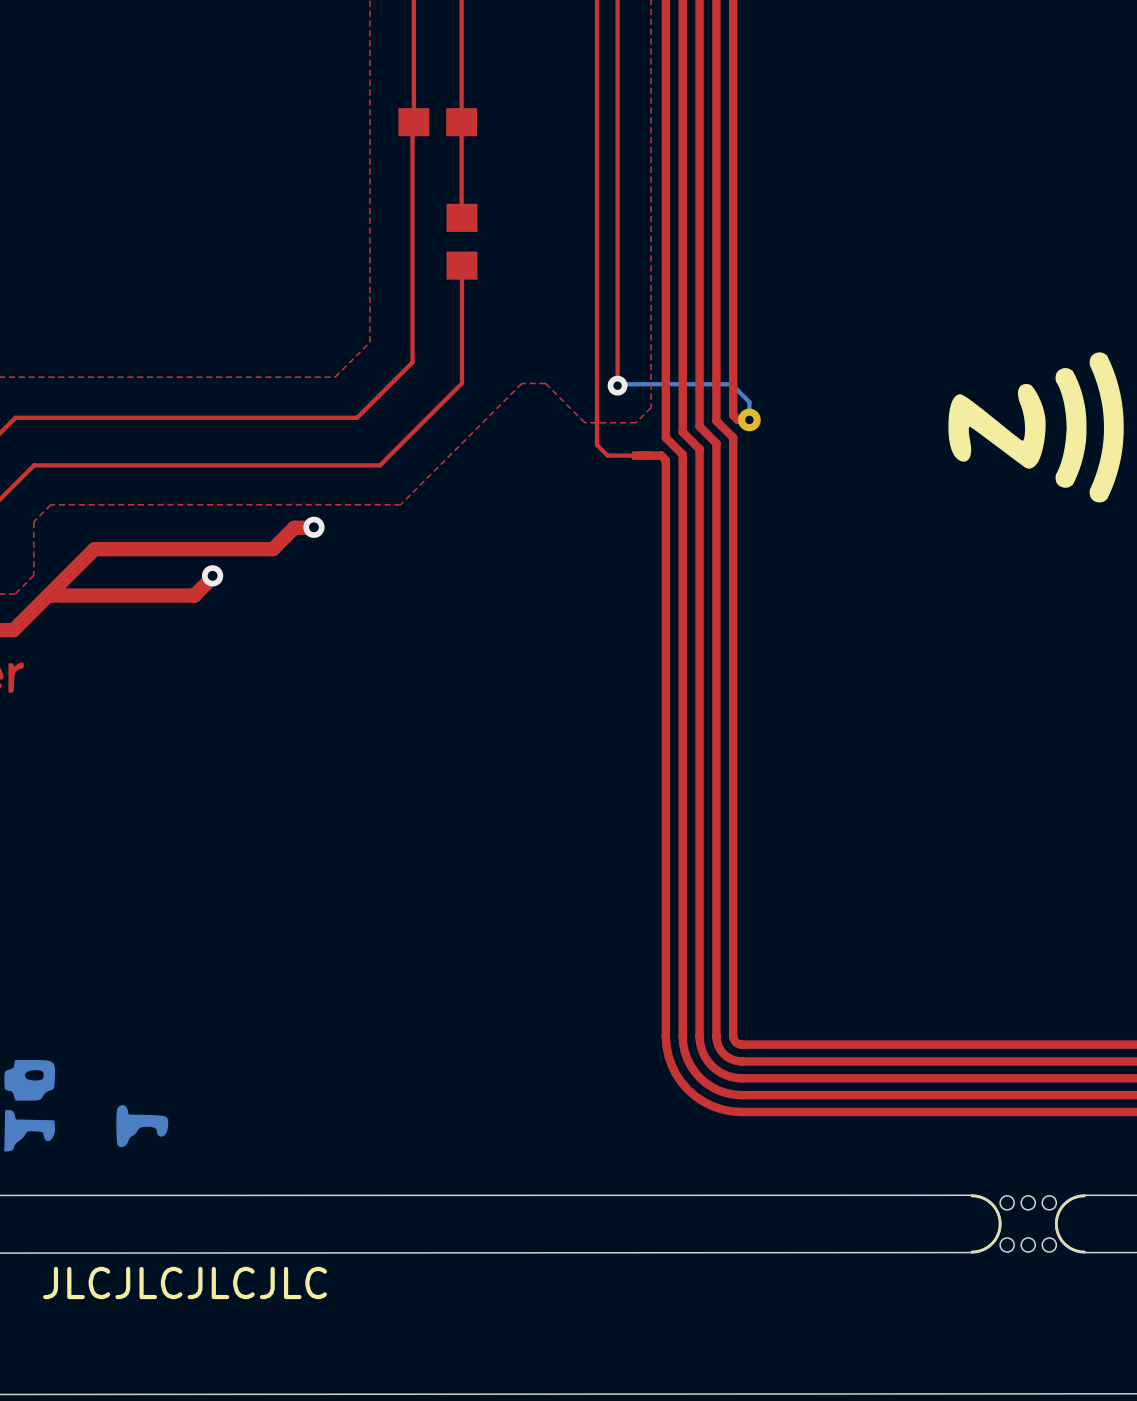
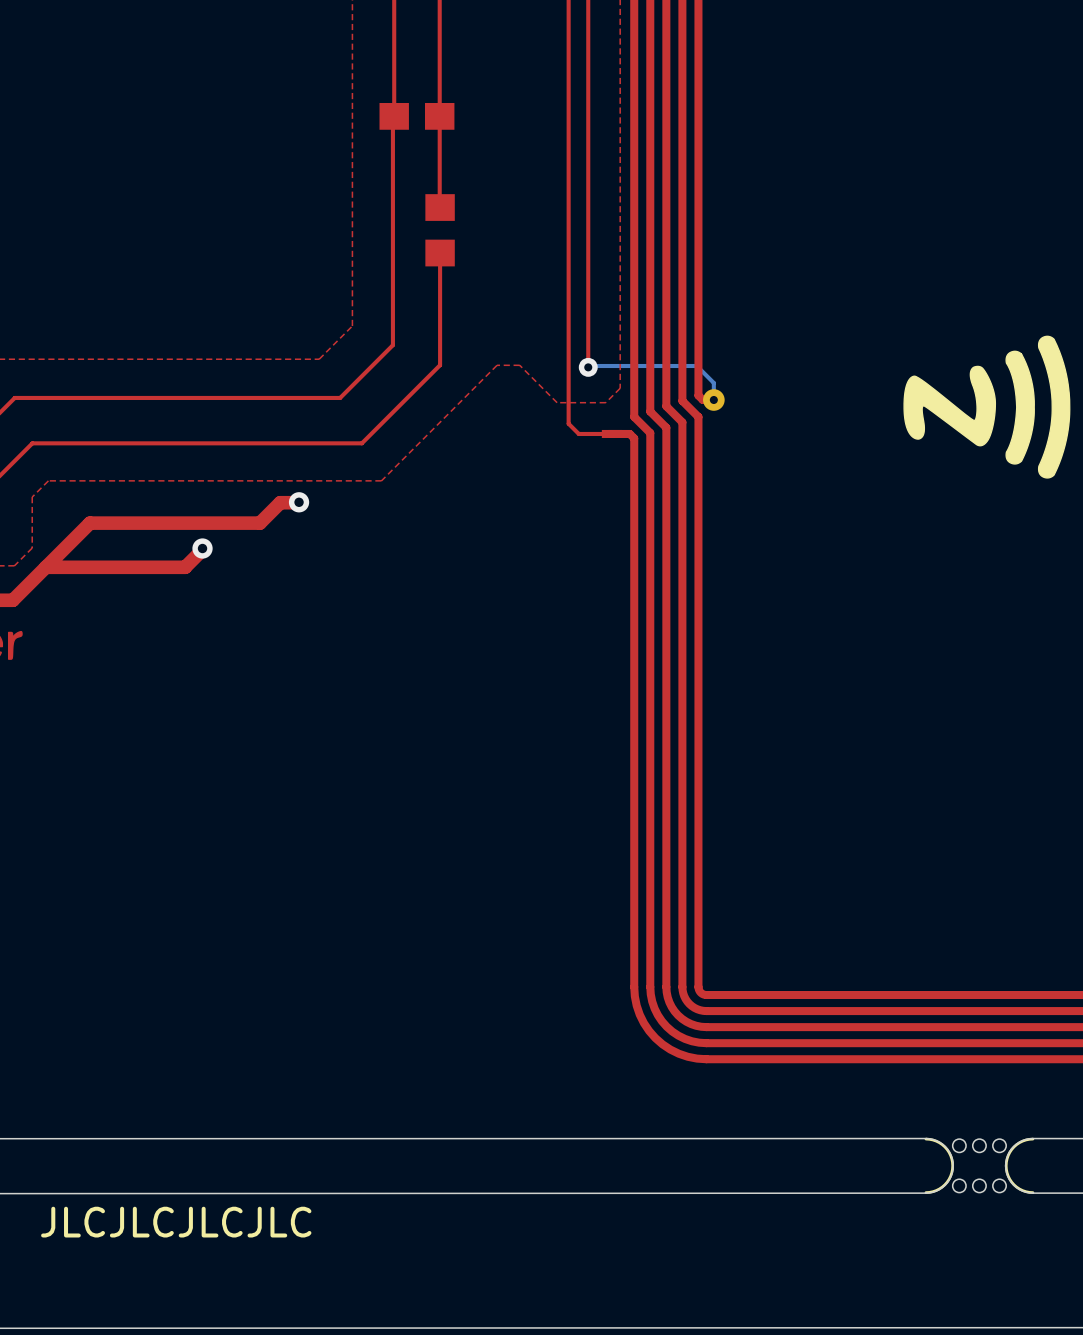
drawing: [4, 1060, 56, 1152] -> none
drawing: [116, 1105, 169, 1148] -> none

